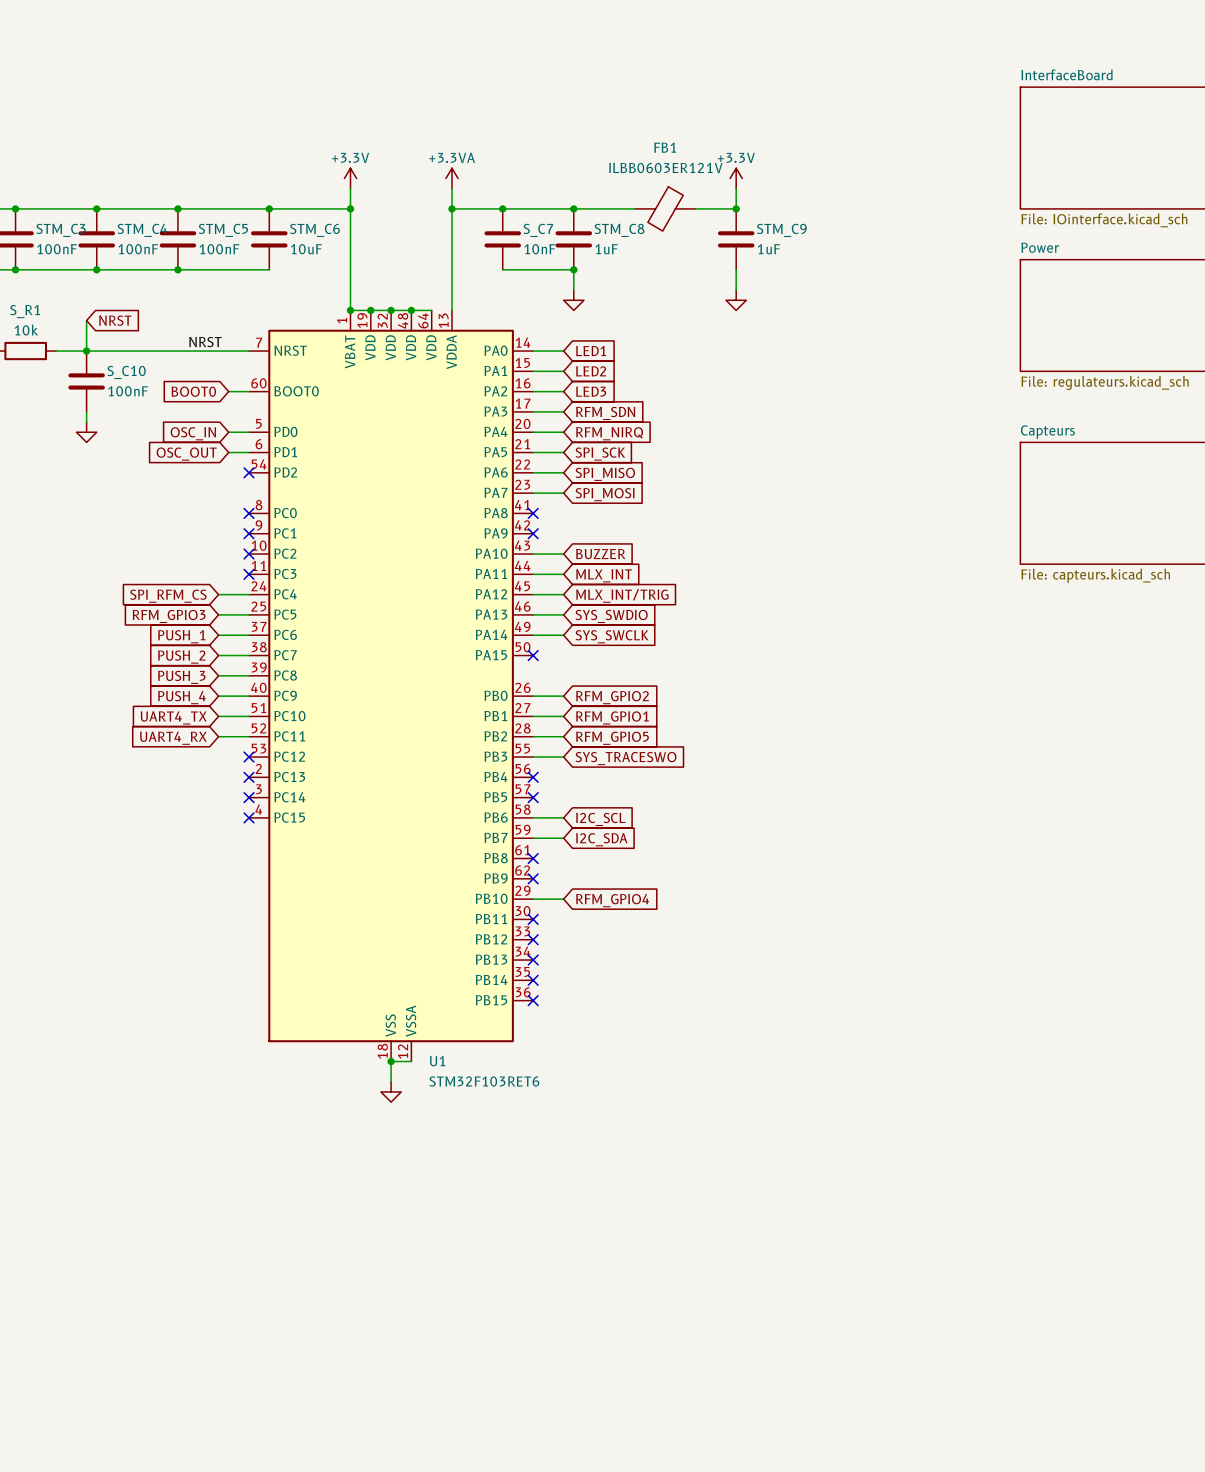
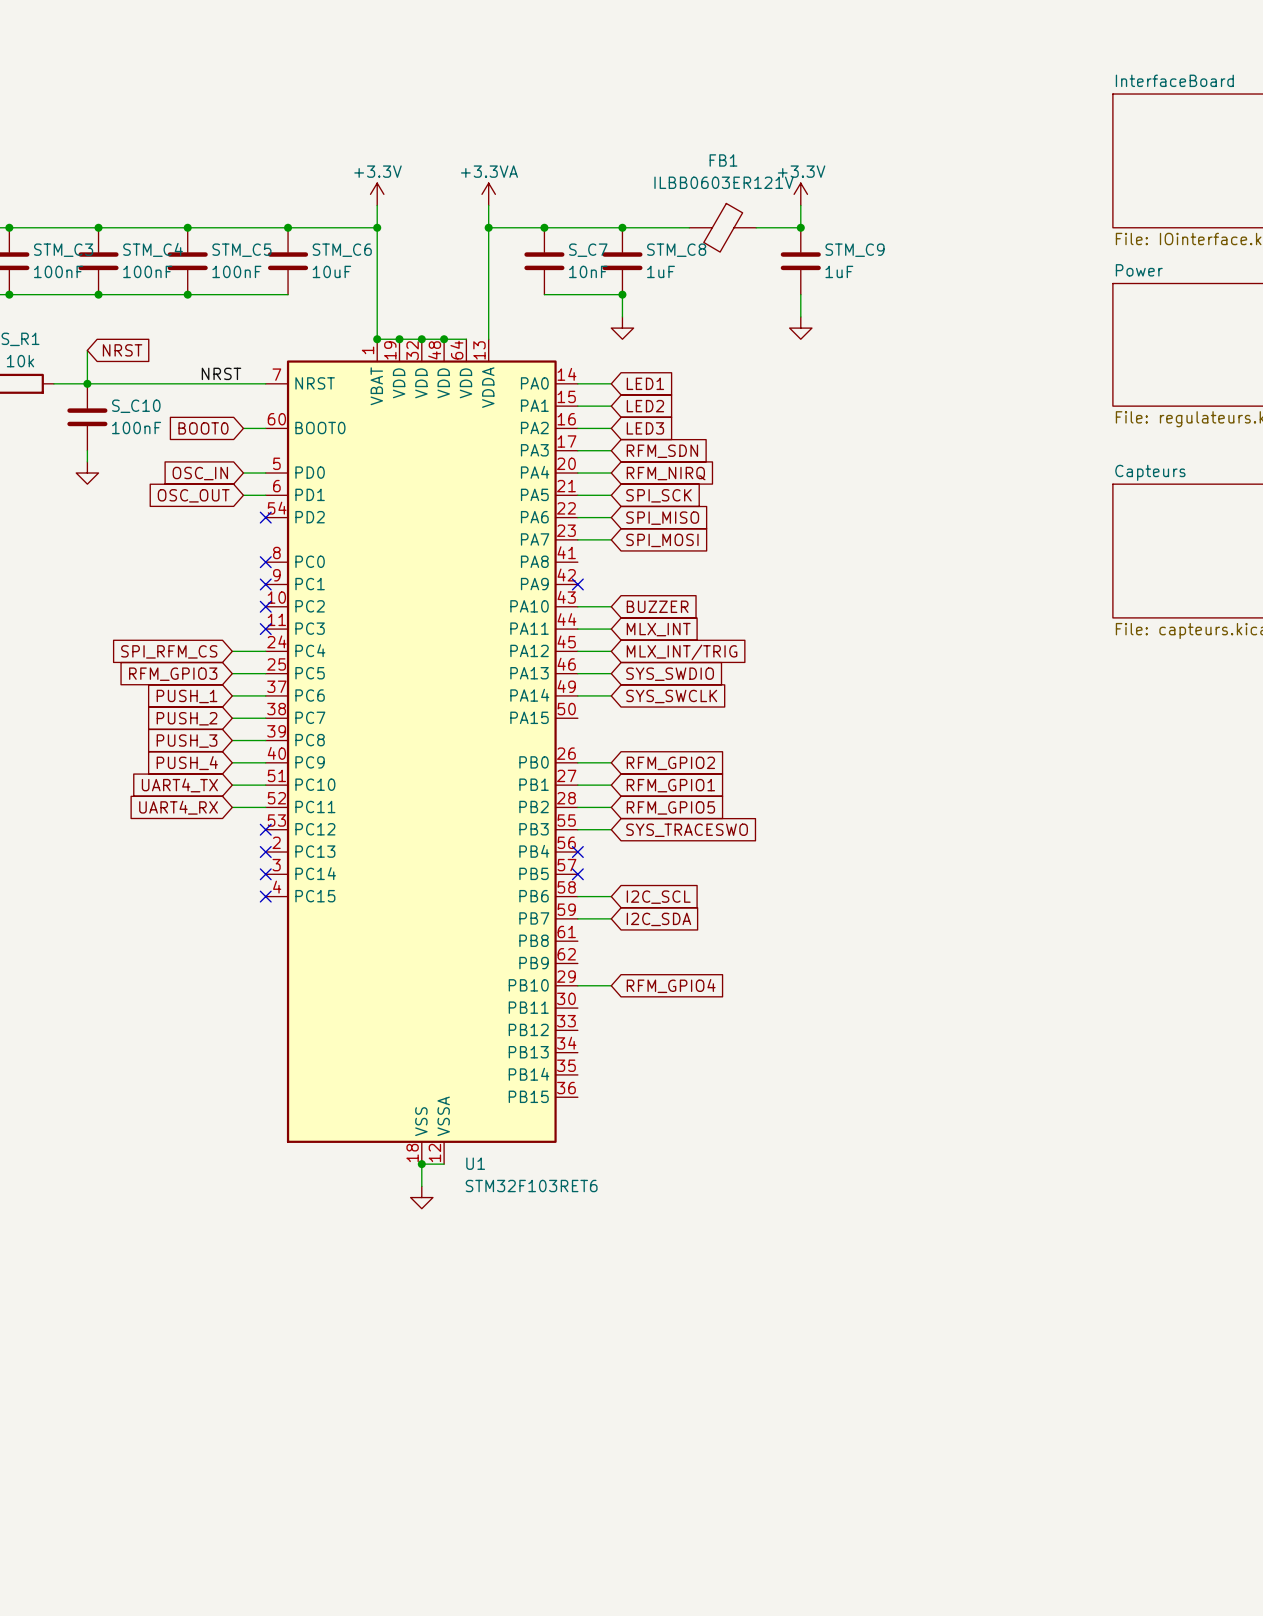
no-connect mark: (533, 513) -> none
no-connect mark: (533, 655) -> none
no-connect mark: (533, 858) -> none
no-connect mark: (533, 878) -> none
no-connect mark: (533, 919) -> none
no-connect mark: (533, 939) -> none
no-connect mark: (533, 960) -> none
no-connect mark: (533, 980) -> none
no-connect mark: (533, 1000) -> none

